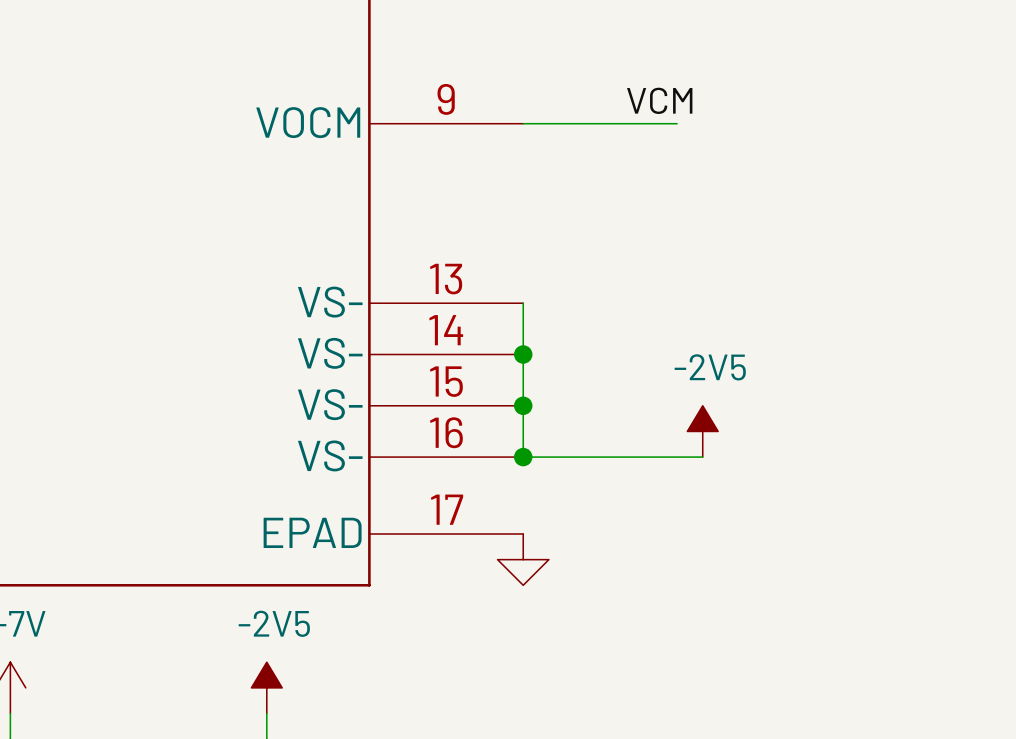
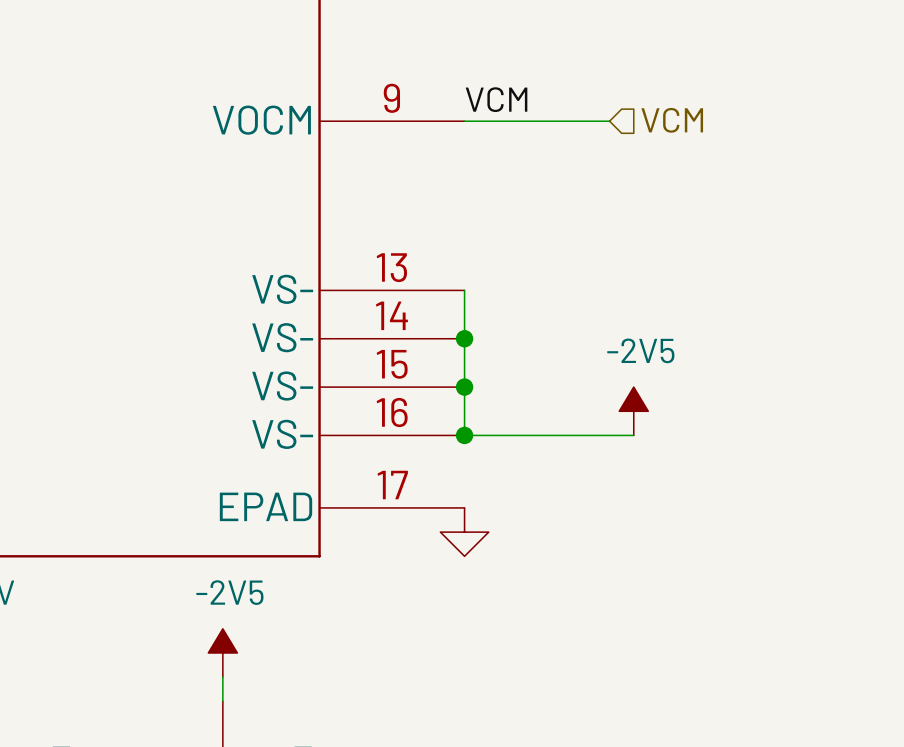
label position: VCM (659, 100) -> VCM (496, 99)
hierarchical label: none -> VCM (672, 120)

